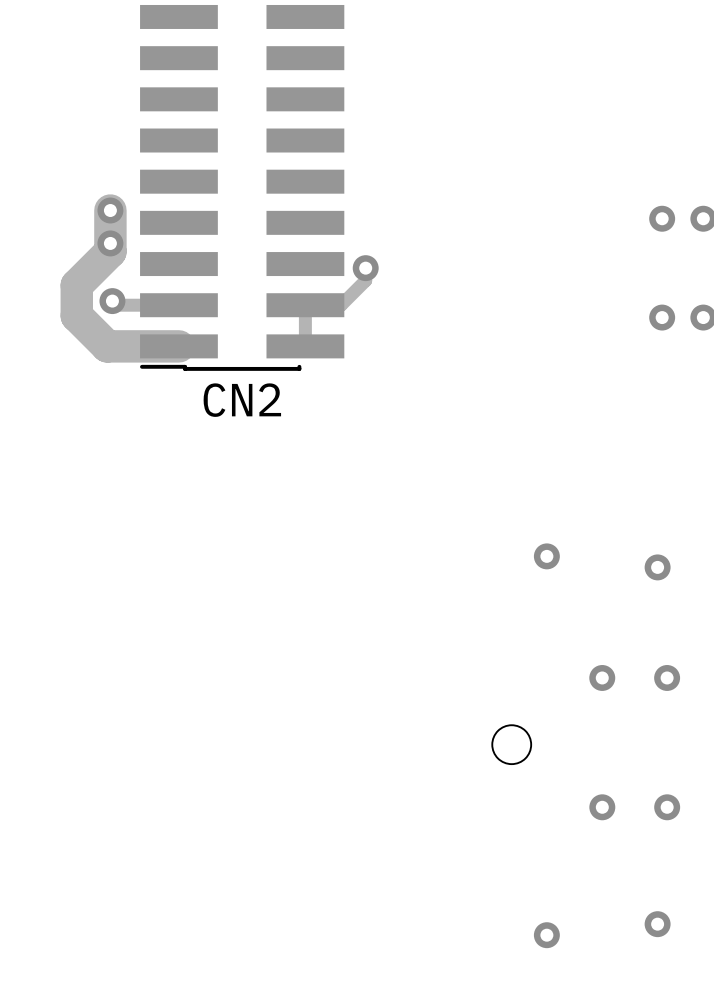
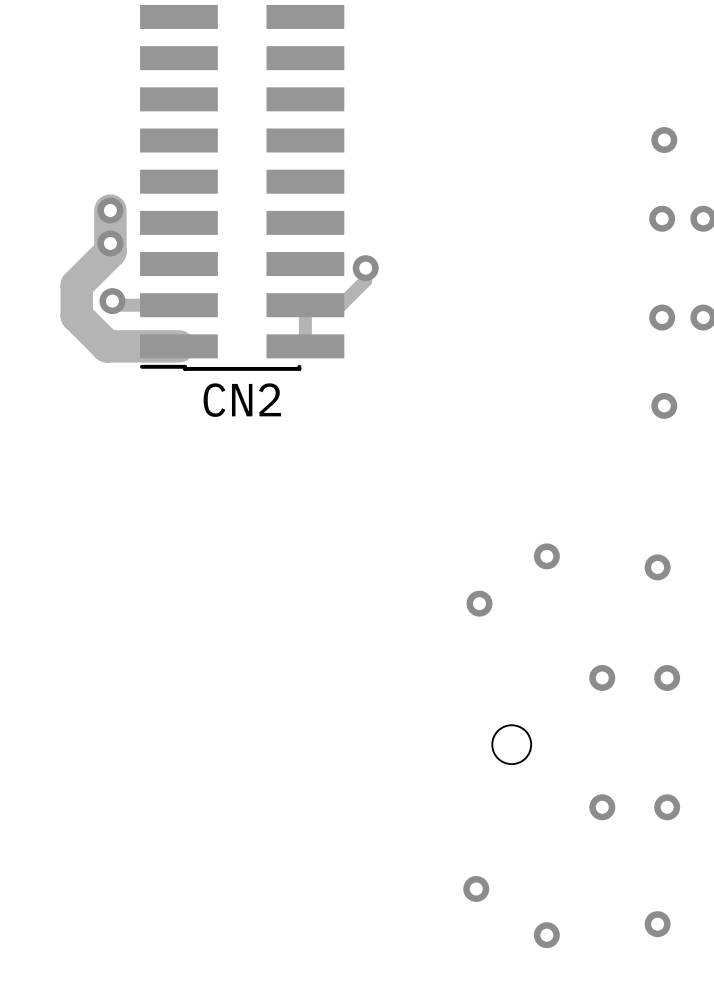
via: none -> (664, 140)
via: none -> (664, 405)
via: none -> (479, 603)
via: none -> (476, 888)

